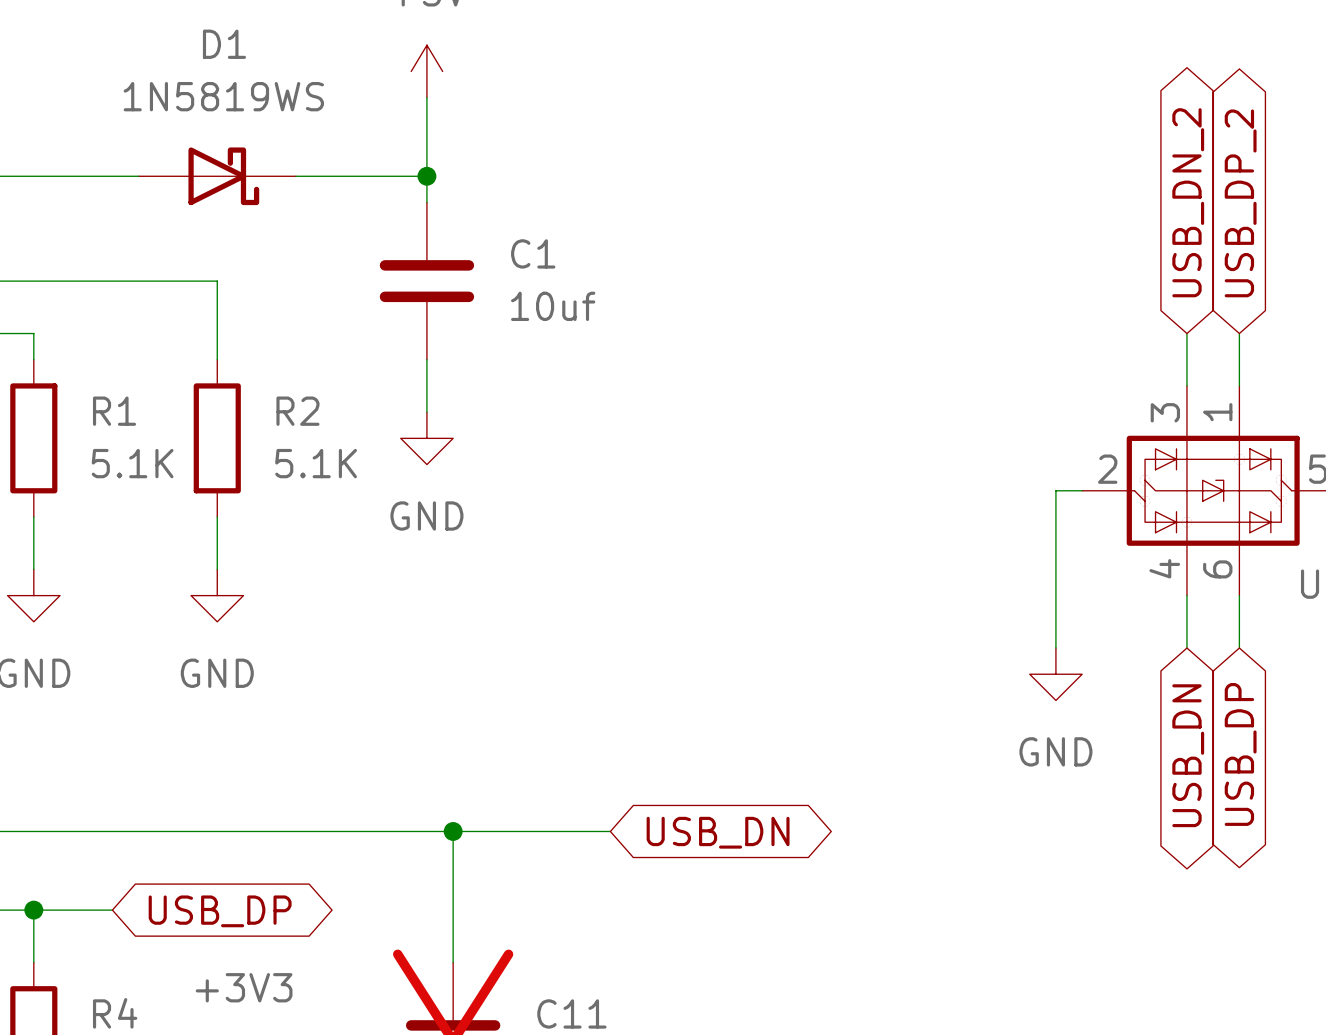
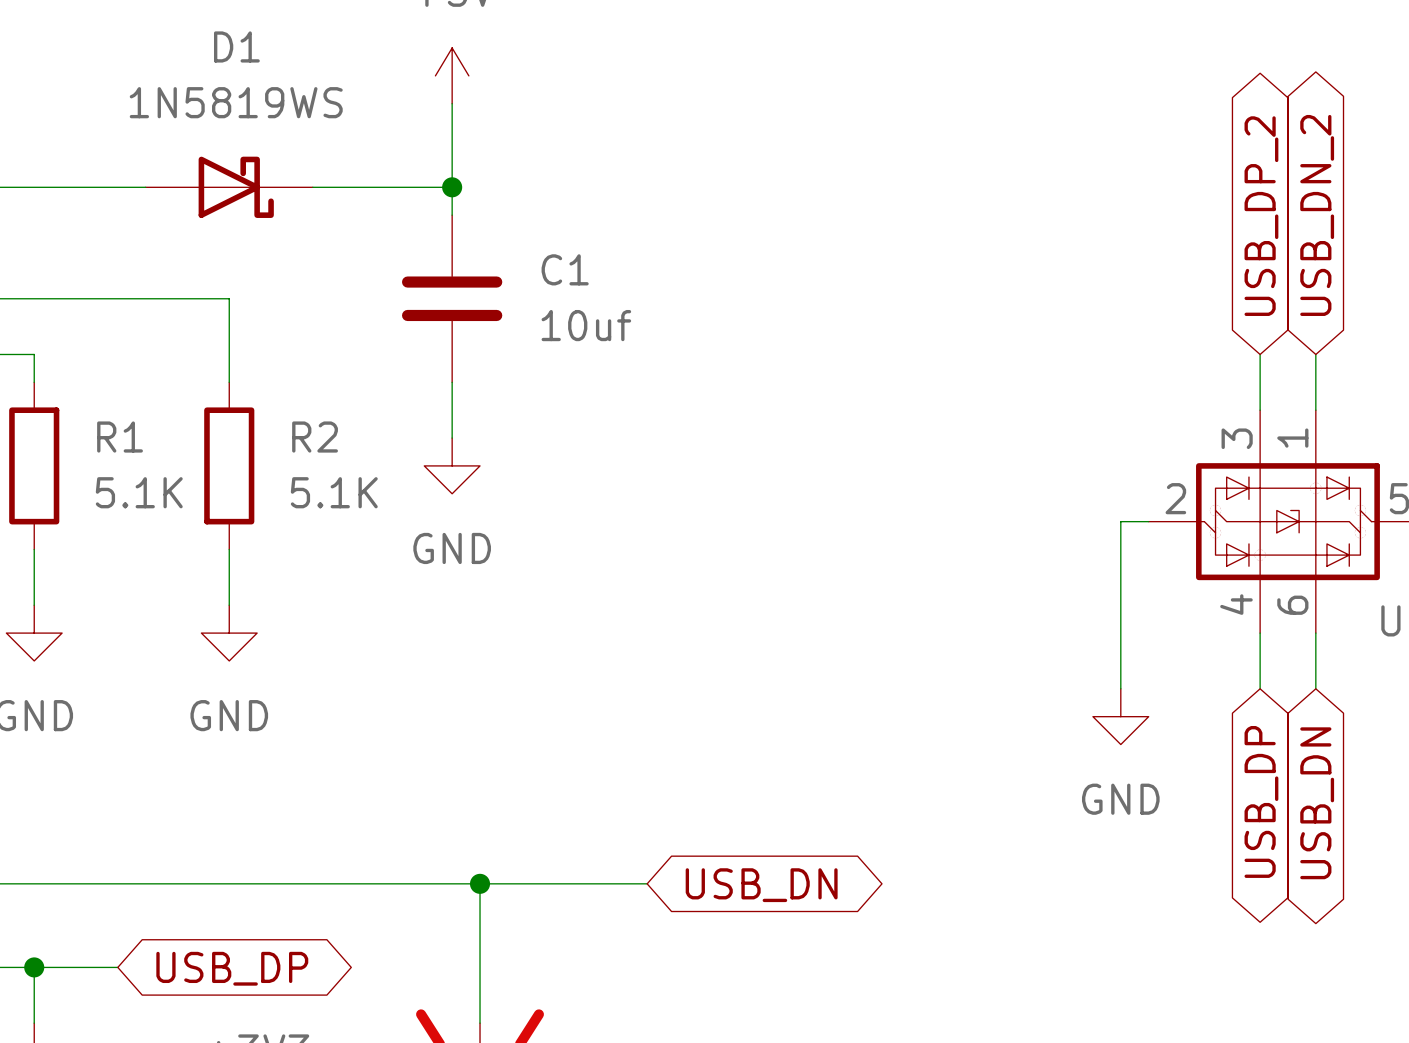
global label: USB_DN_2 (1188, 202) -> USB_DP_2 (1261, 216)
global label: USB_DP_2 (1240, 203) -> USB_DN_2 (1317, 215)
global label: USB_DP (1240, 754) -> USB_DN (1317, 803)
global label: USB_DN (1188, 755) -> USB_DP (1261, 801)

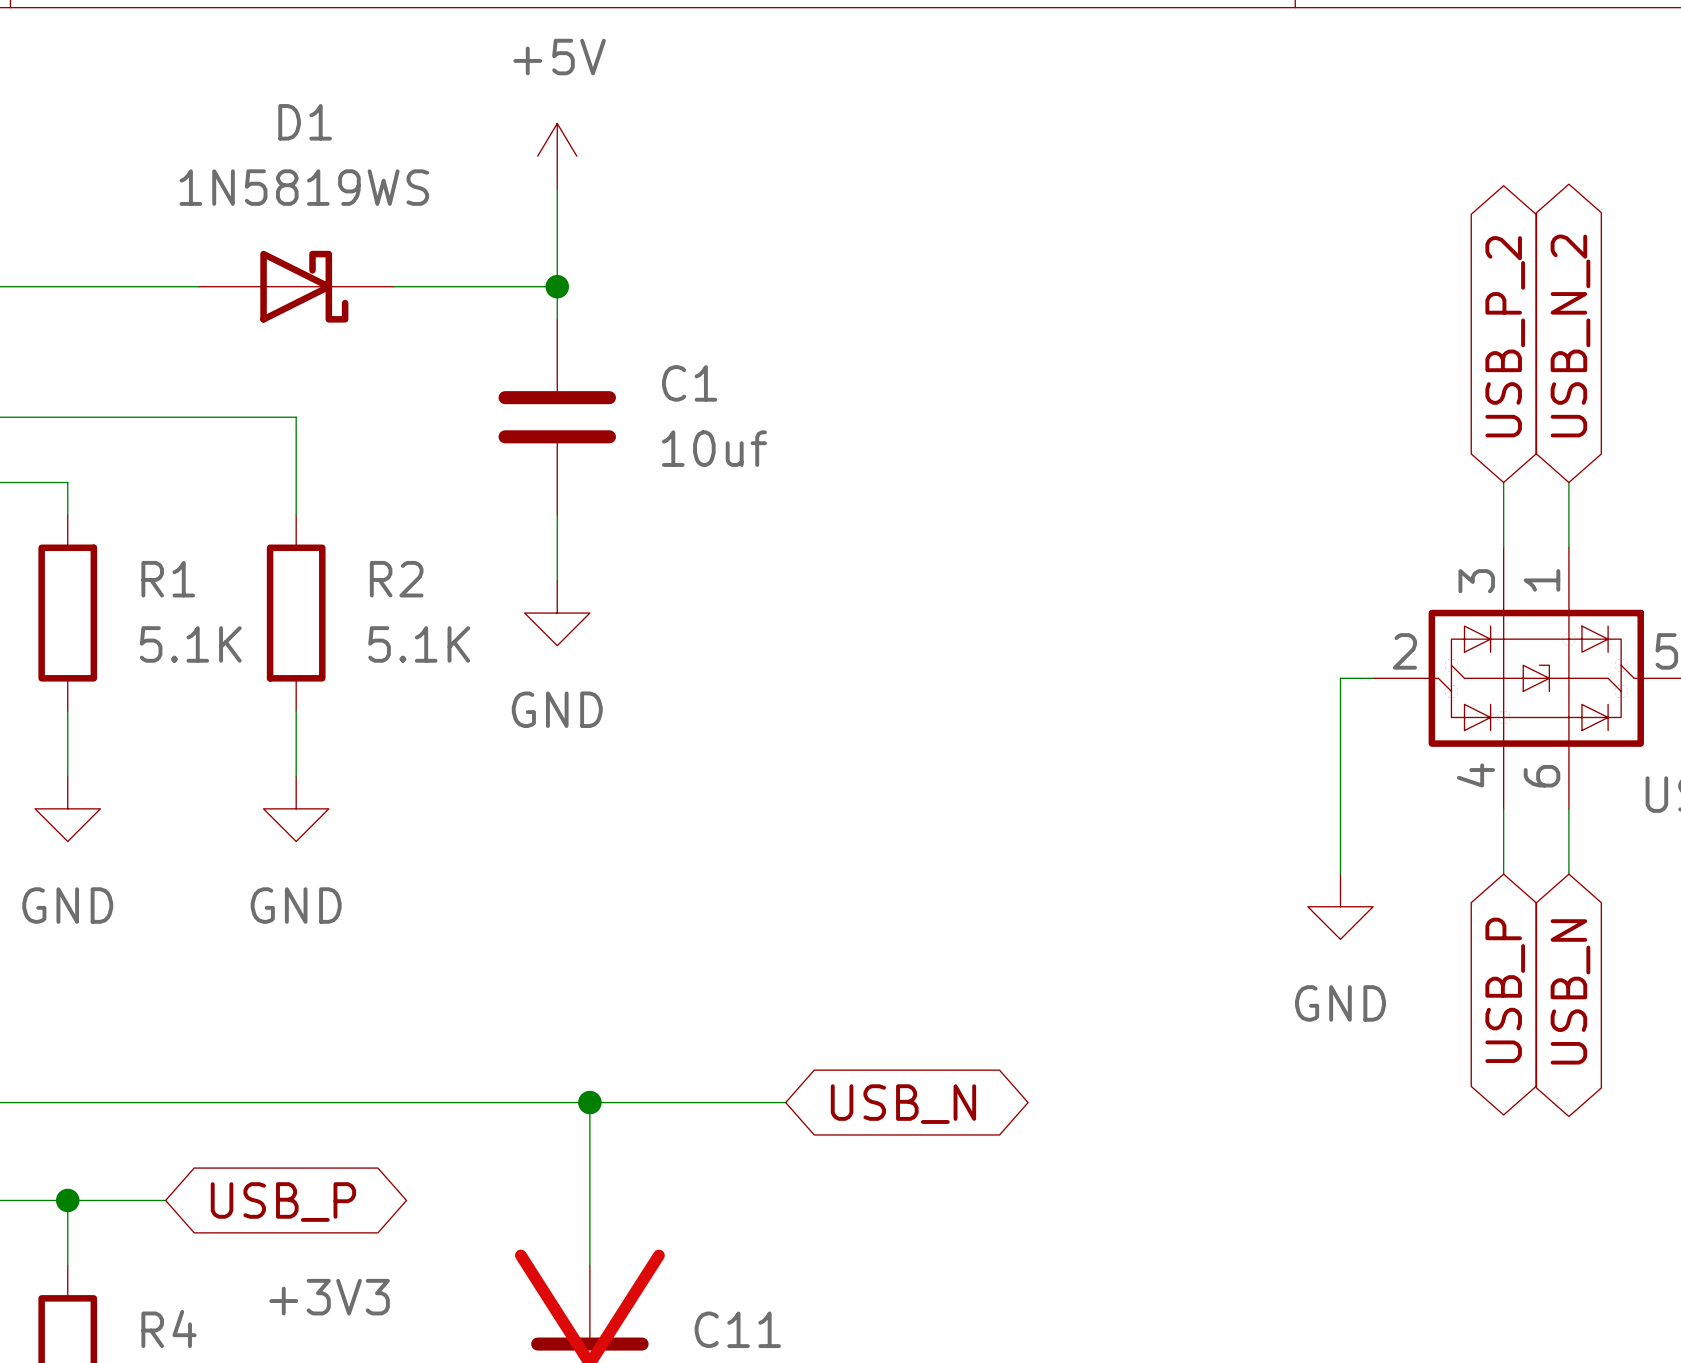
global label: USB_DN_2 (1317, 215) -> USB_N_2 (1570, 335)
global label: USB_DP_2 (1261, 216) -> USB_P_2 (1505, 336)
global label: USB_DP (1261, 801) -> USB_P (1505, 990)
global label: USB_DN (1317, 803) -> USB_N (1570, 991)
global label: USB_DN (761, 885) -> USB_N (903, 1104)
global label: USB_DP (232, 968) -> USB_P (283, 1202)

